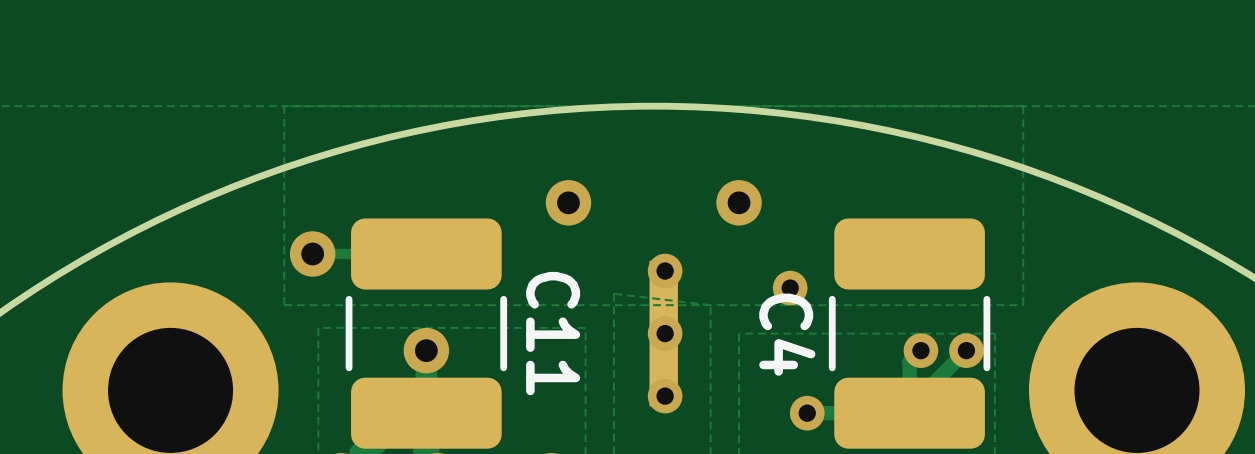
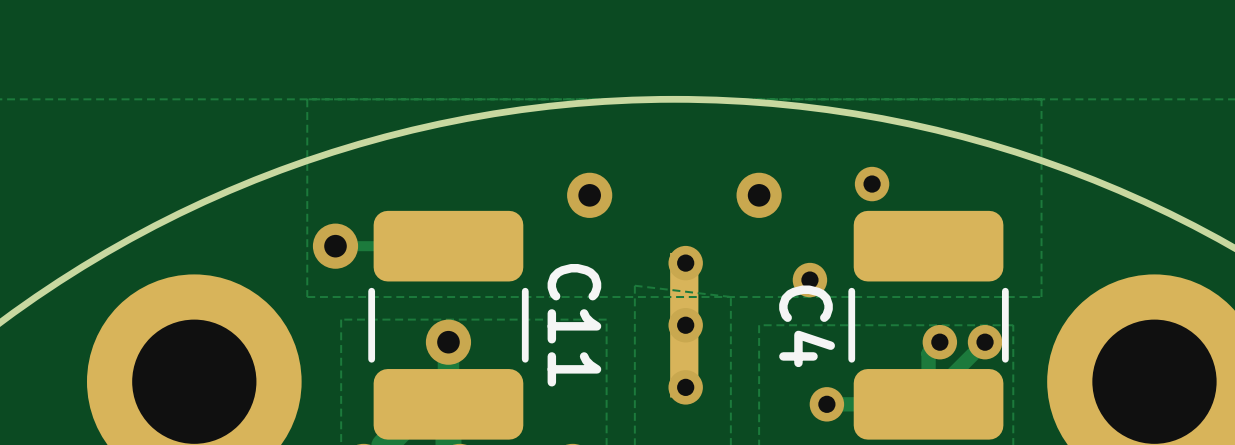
via: none -> (872, 184)

